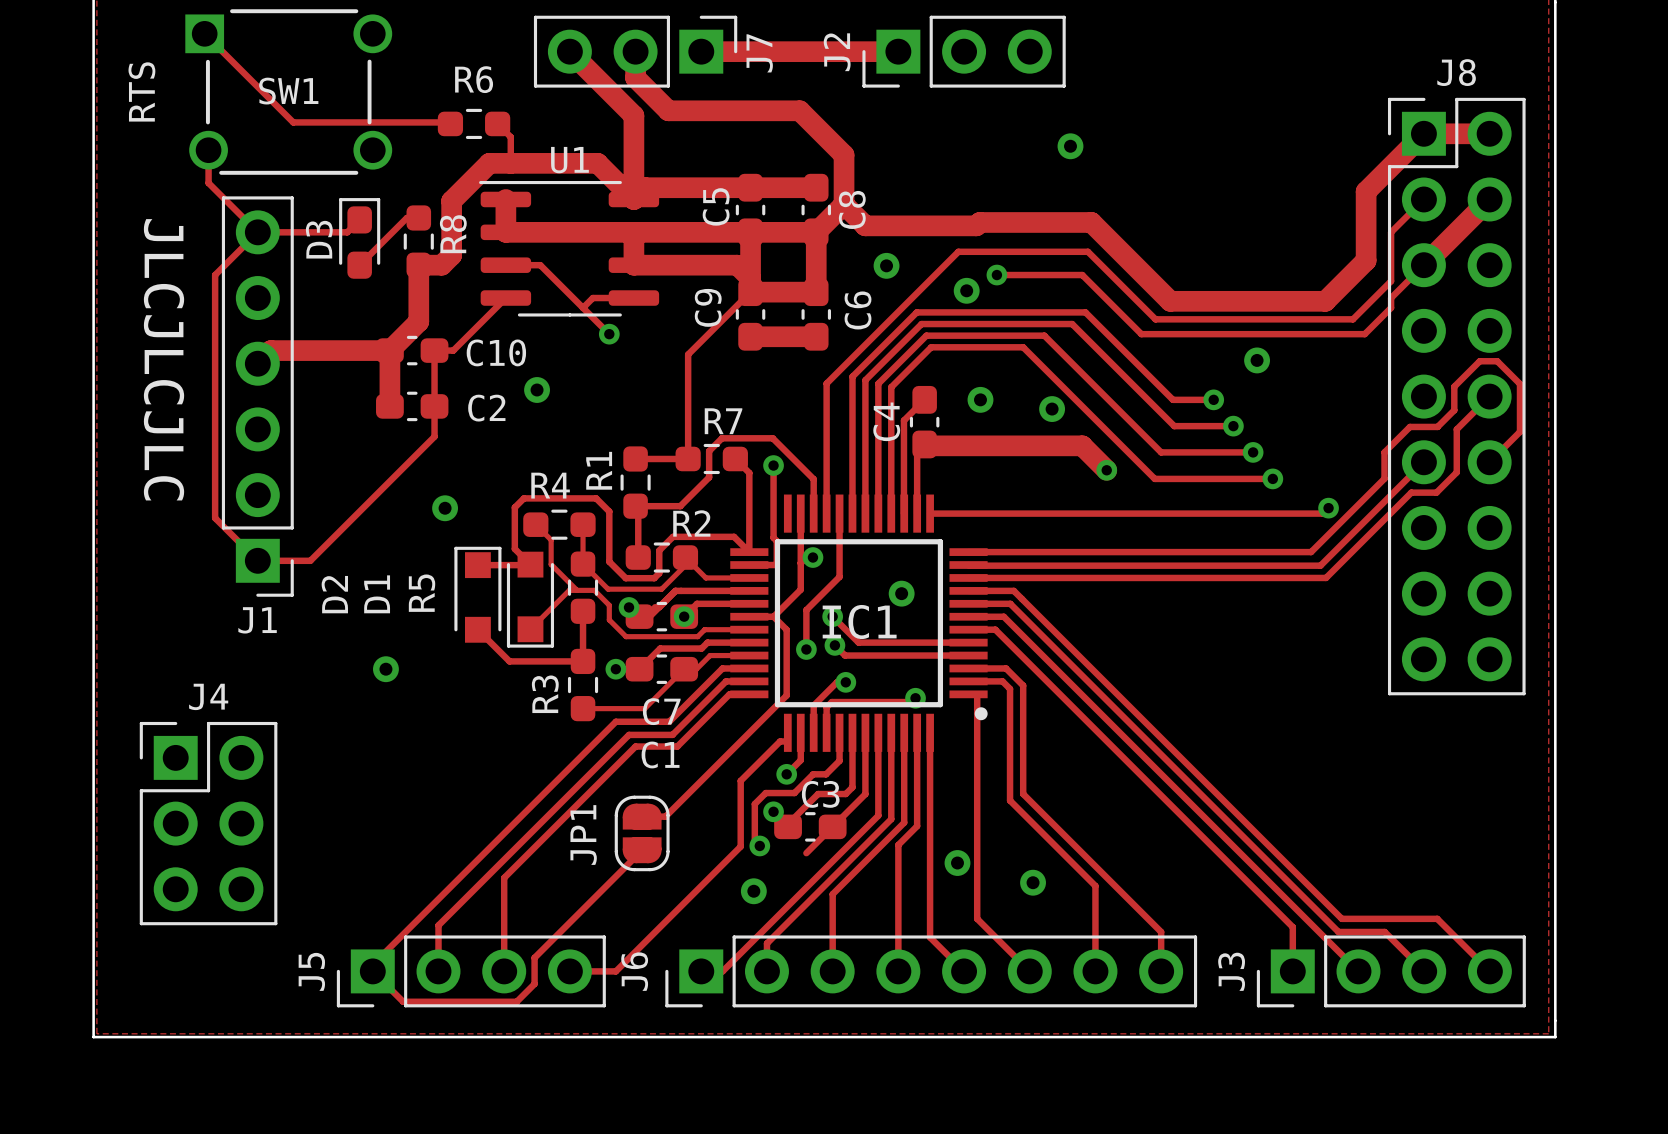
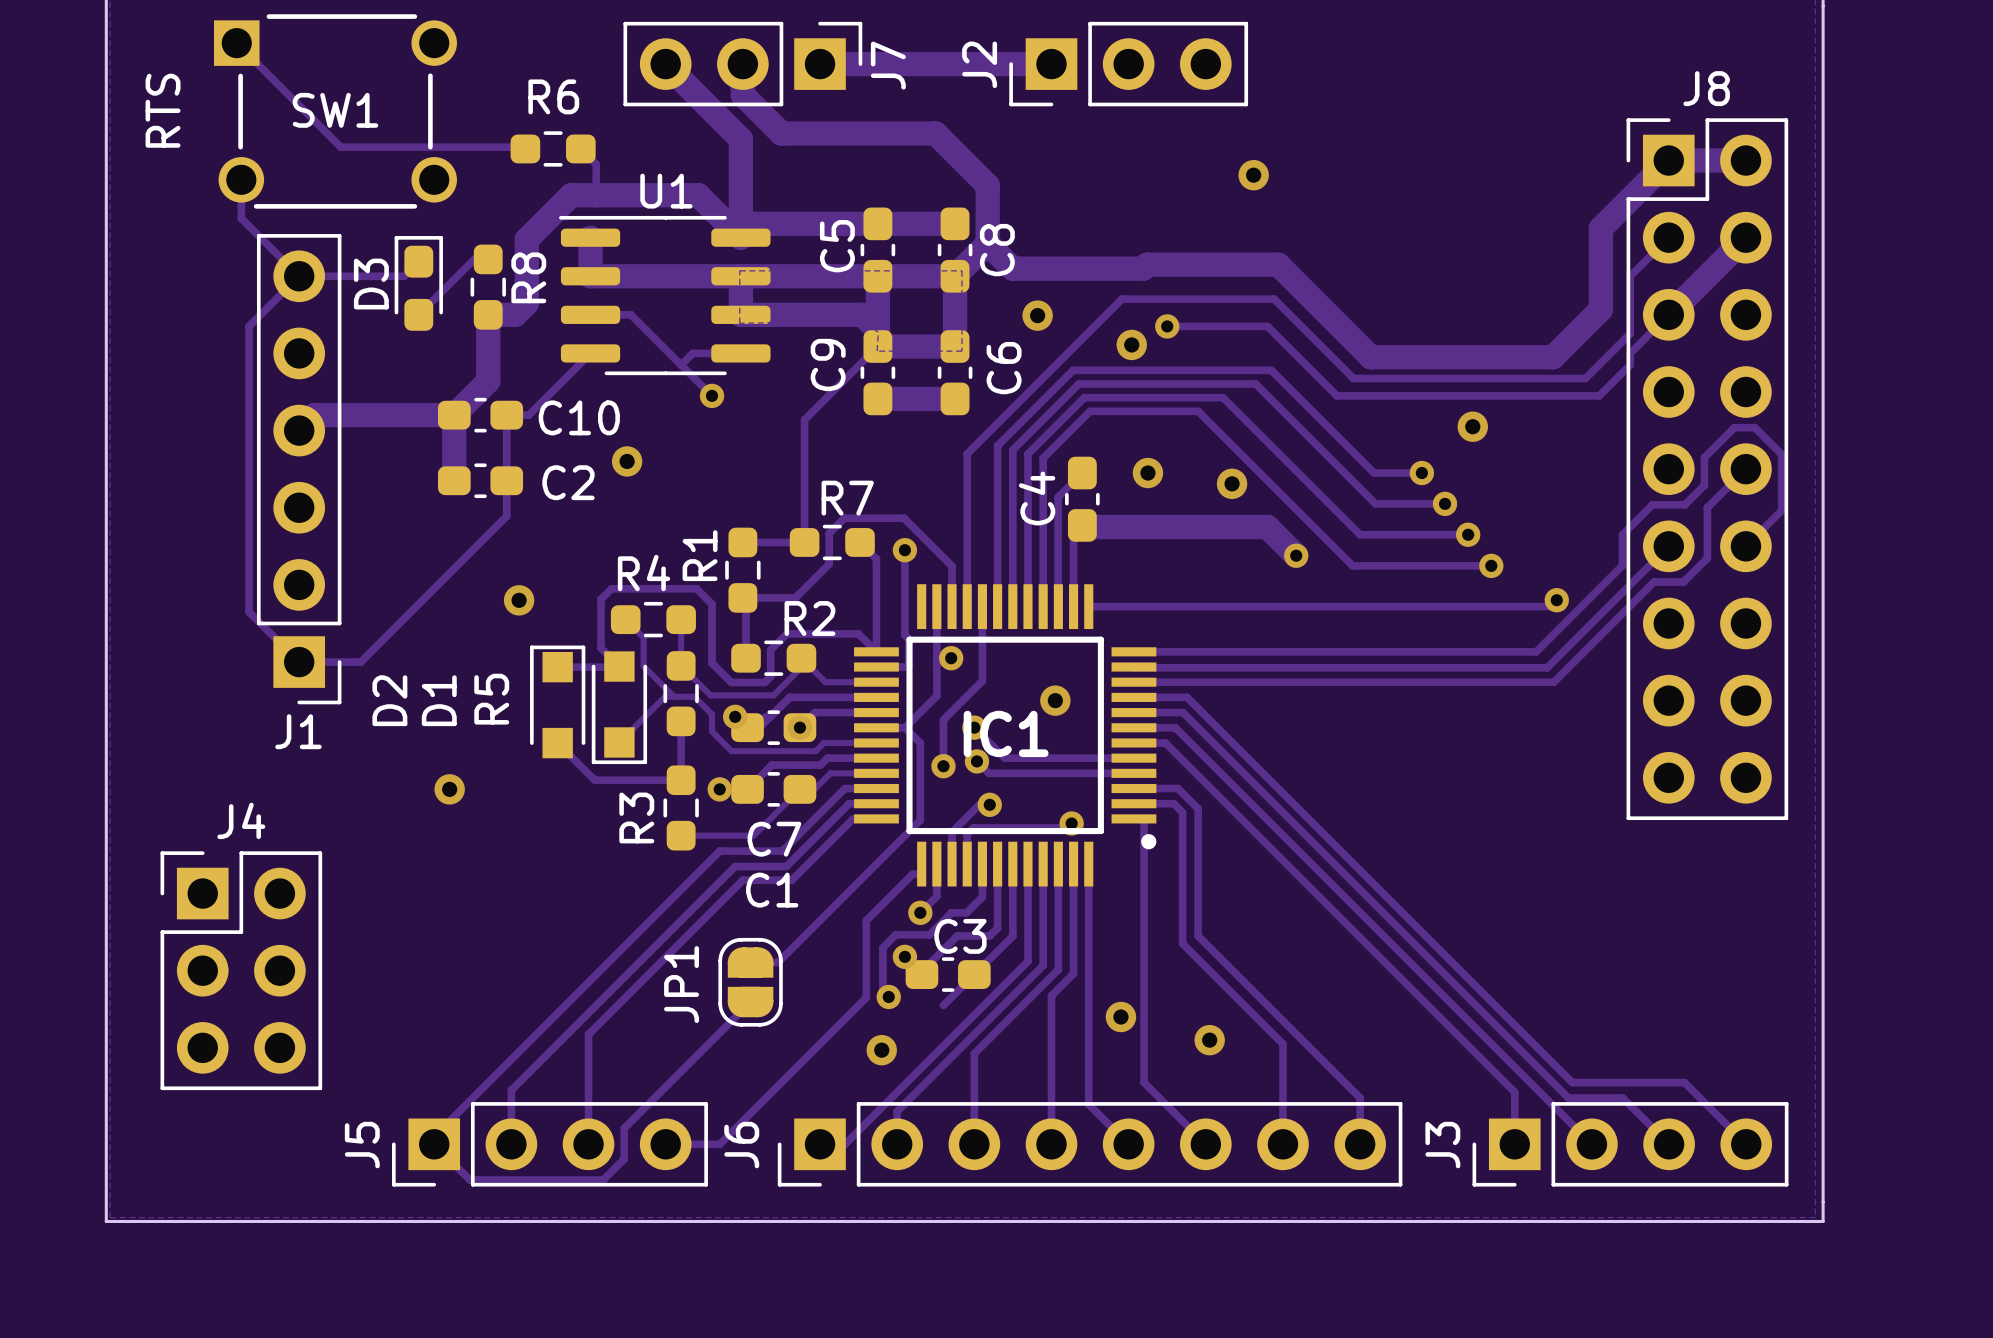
text: JLCJLCJLC (164, 359) -> none

